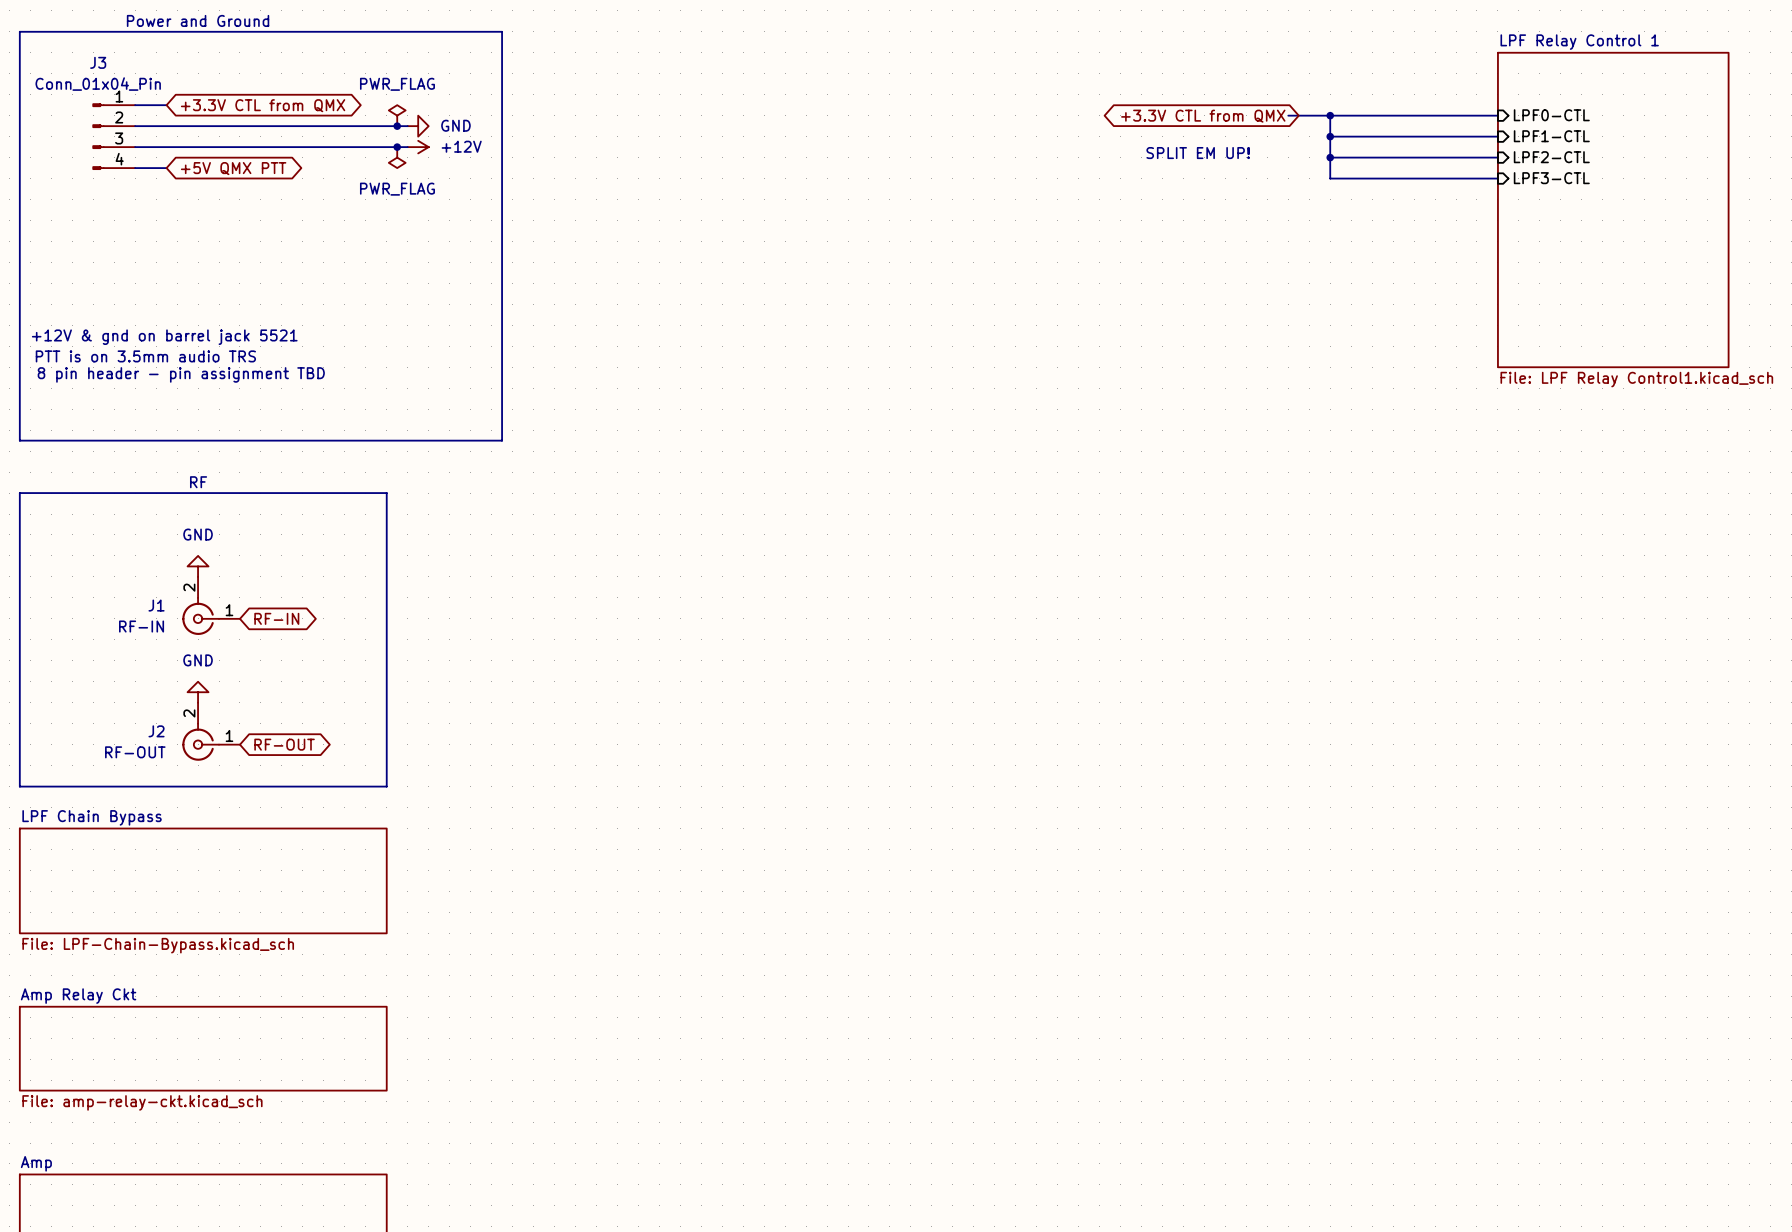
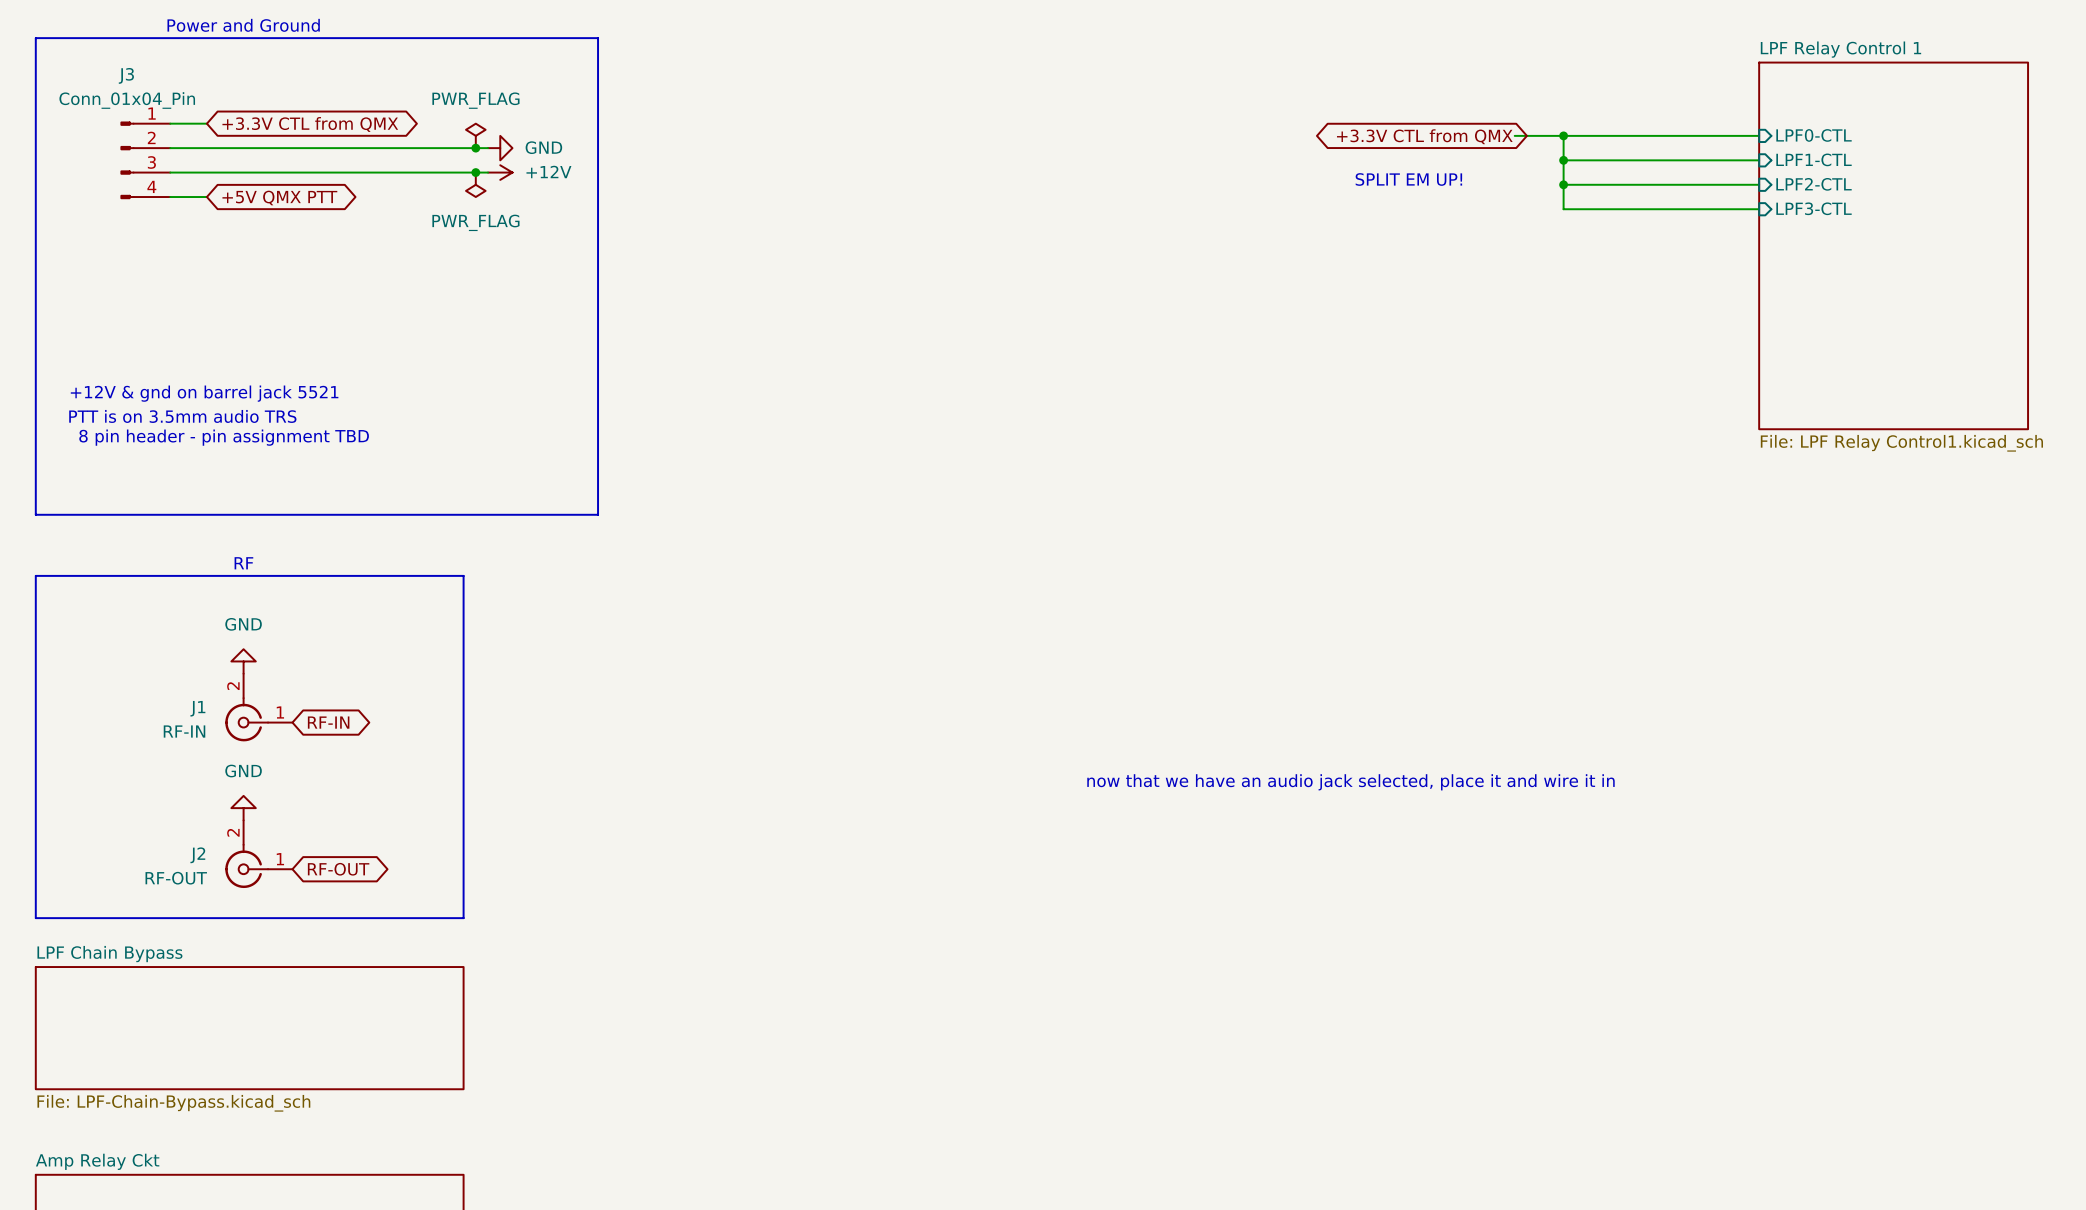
text: none -> now that we have an audio jack selected, place it and wire it in (1350, 782)

